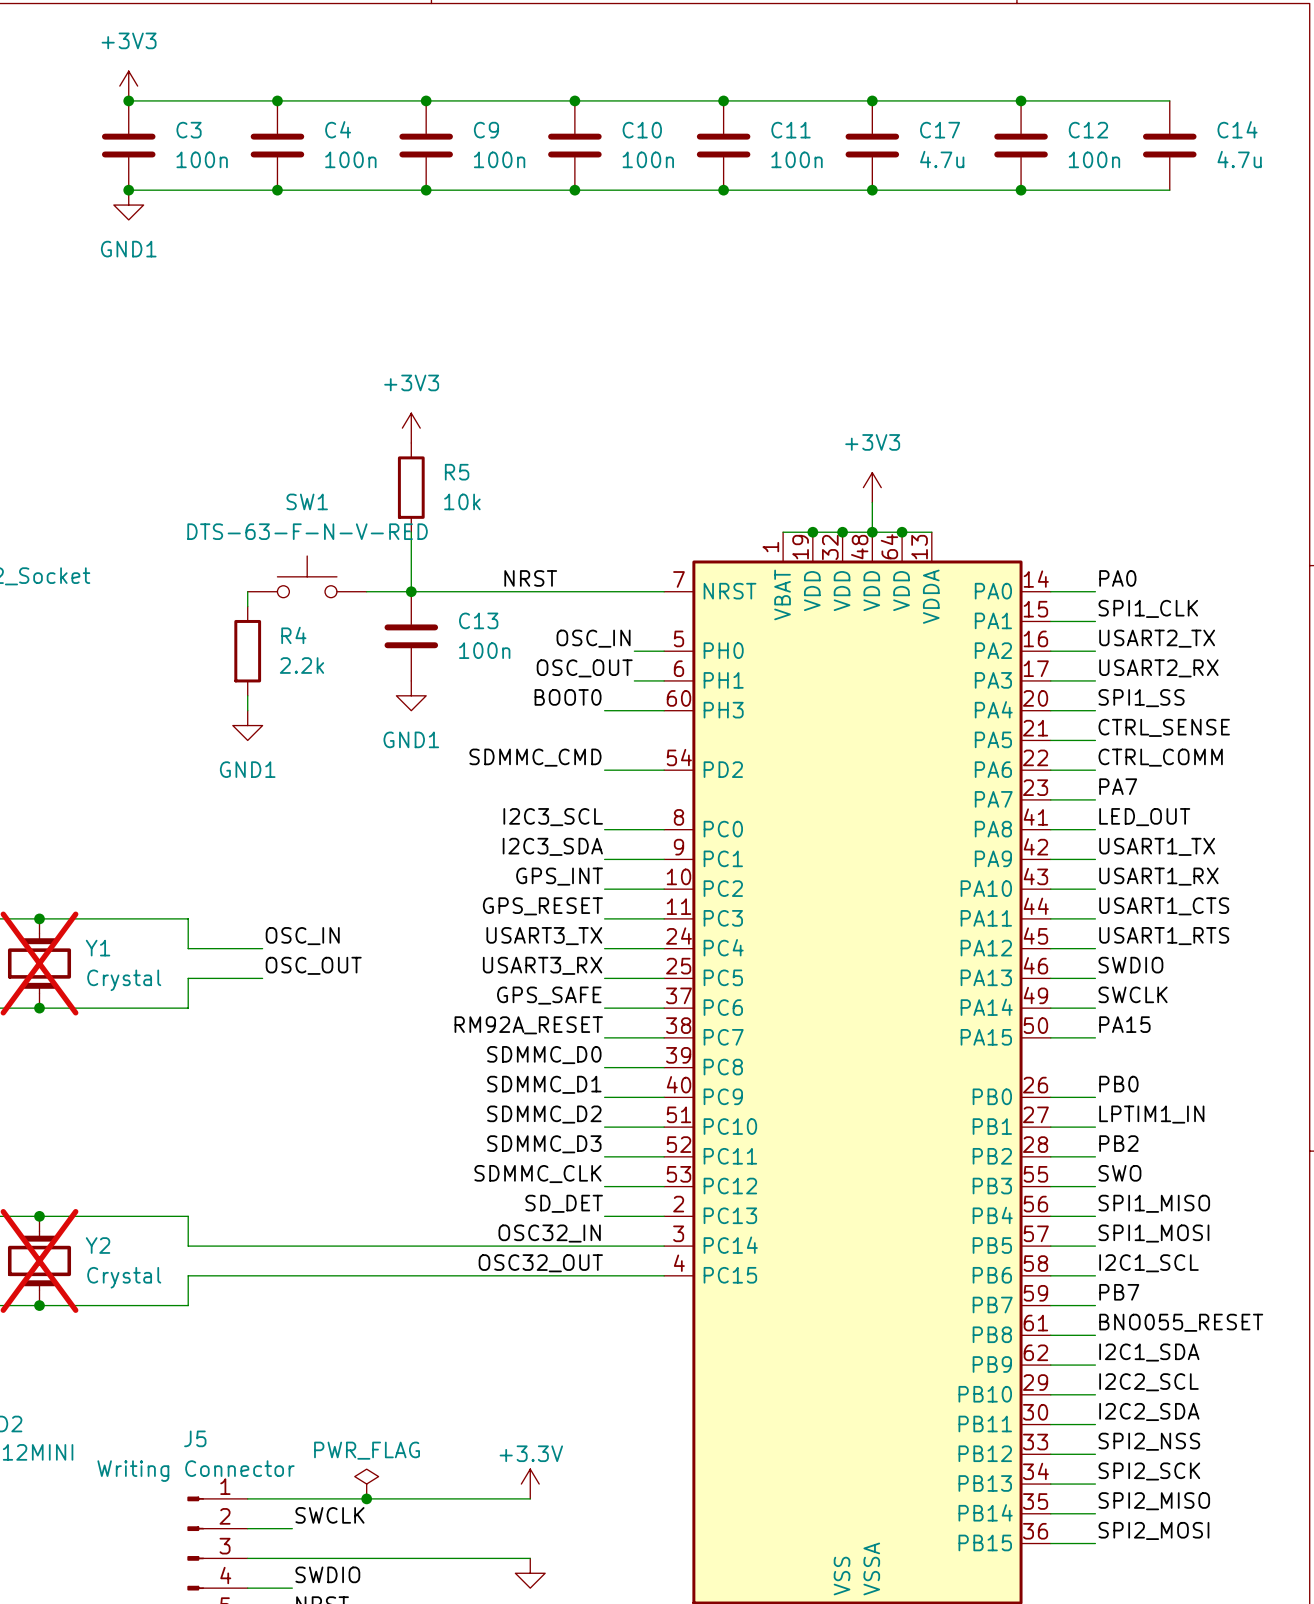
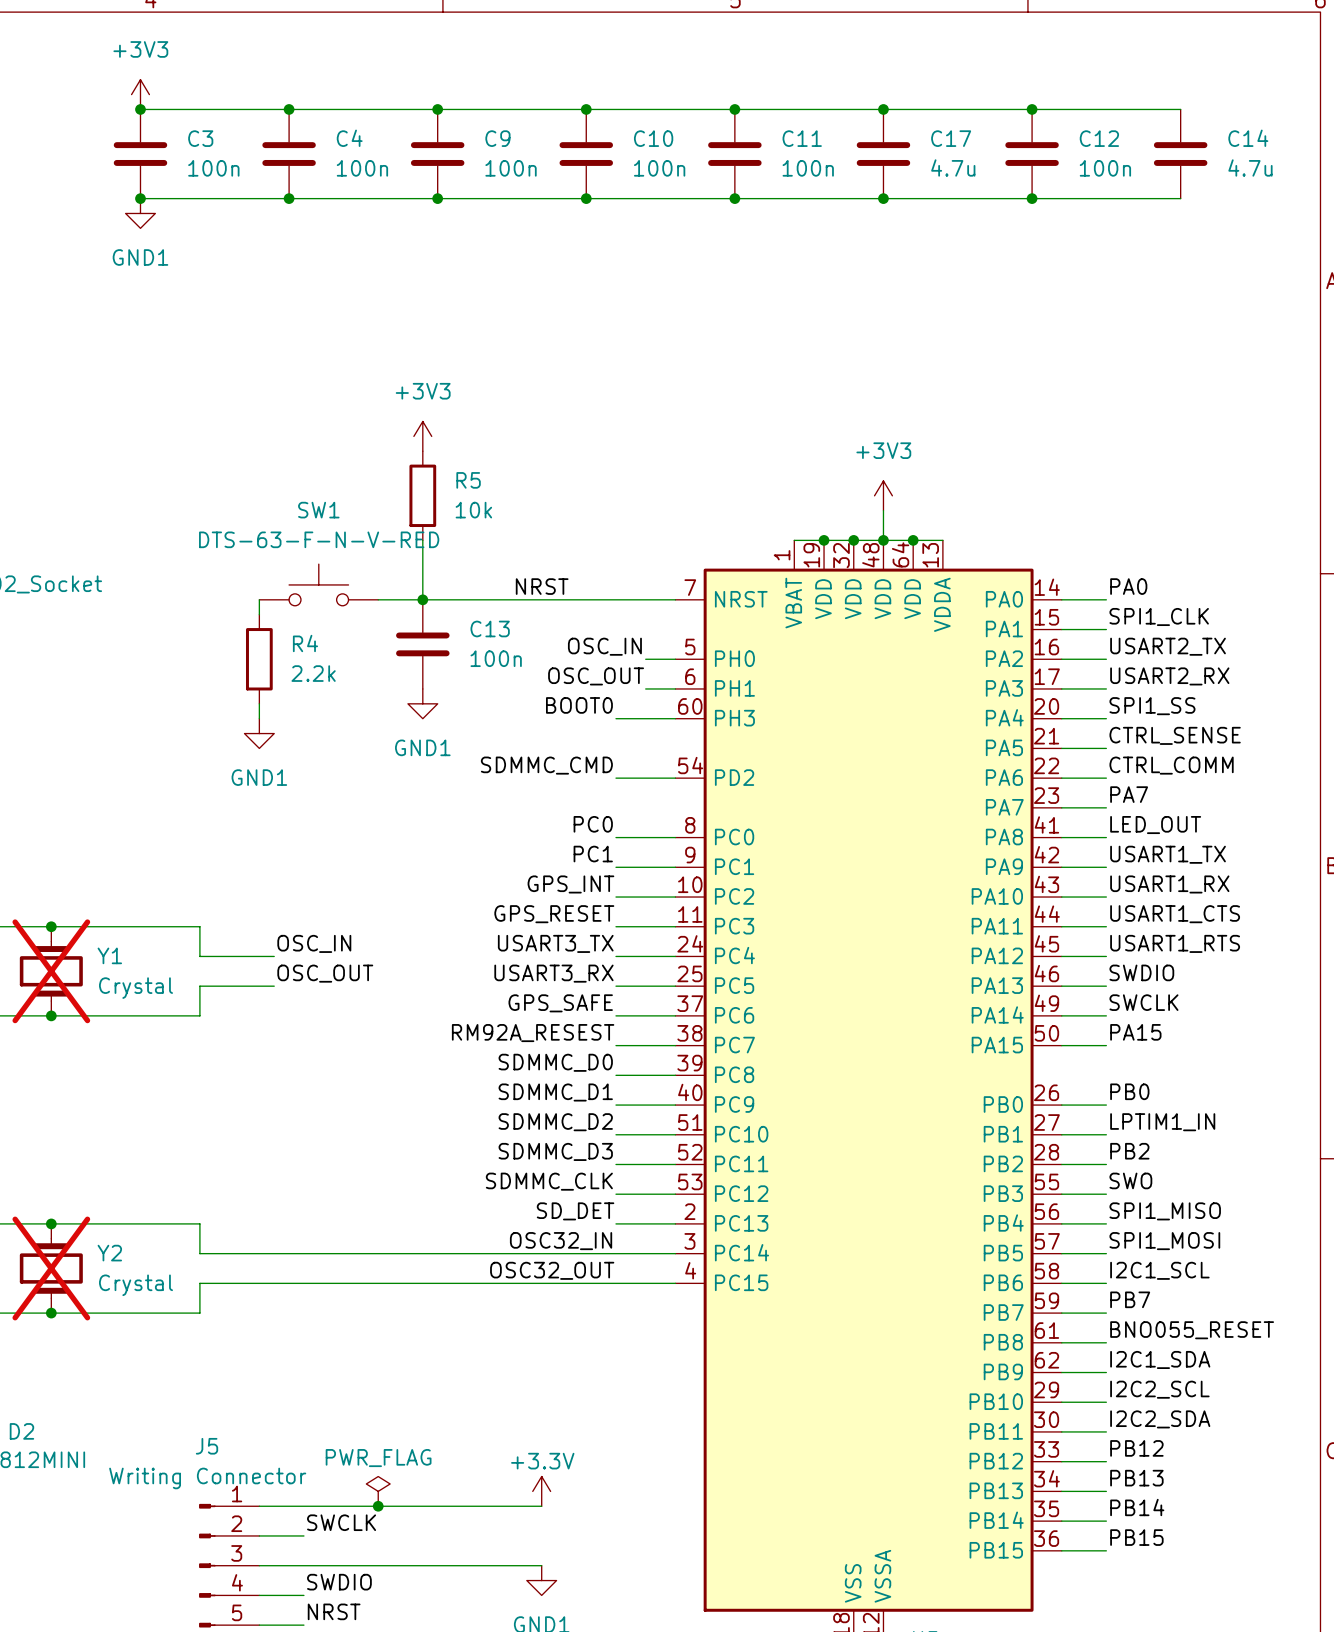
label: I2C3_SCL (553, 817) -> PC0 (593, 824)
label: I2C3_SDA (552, 846) -> PC1 (593, 854)
label: RM92A_RESET (528, 1025) -> RM92A_RESEST (533, 1033)
label: SPI2_NSS (1149, 1441) -> PB12 (1136, 1448)
label: SPI2_SCK (1149, 1471) -> PB13 (1136, 1478)
label: SPI2_MISO (1154, 1501) -> PB14 (1137, 1507)
label: SPI2_MOSI (1153, 1530) -> PB15 (1136, 1537)

